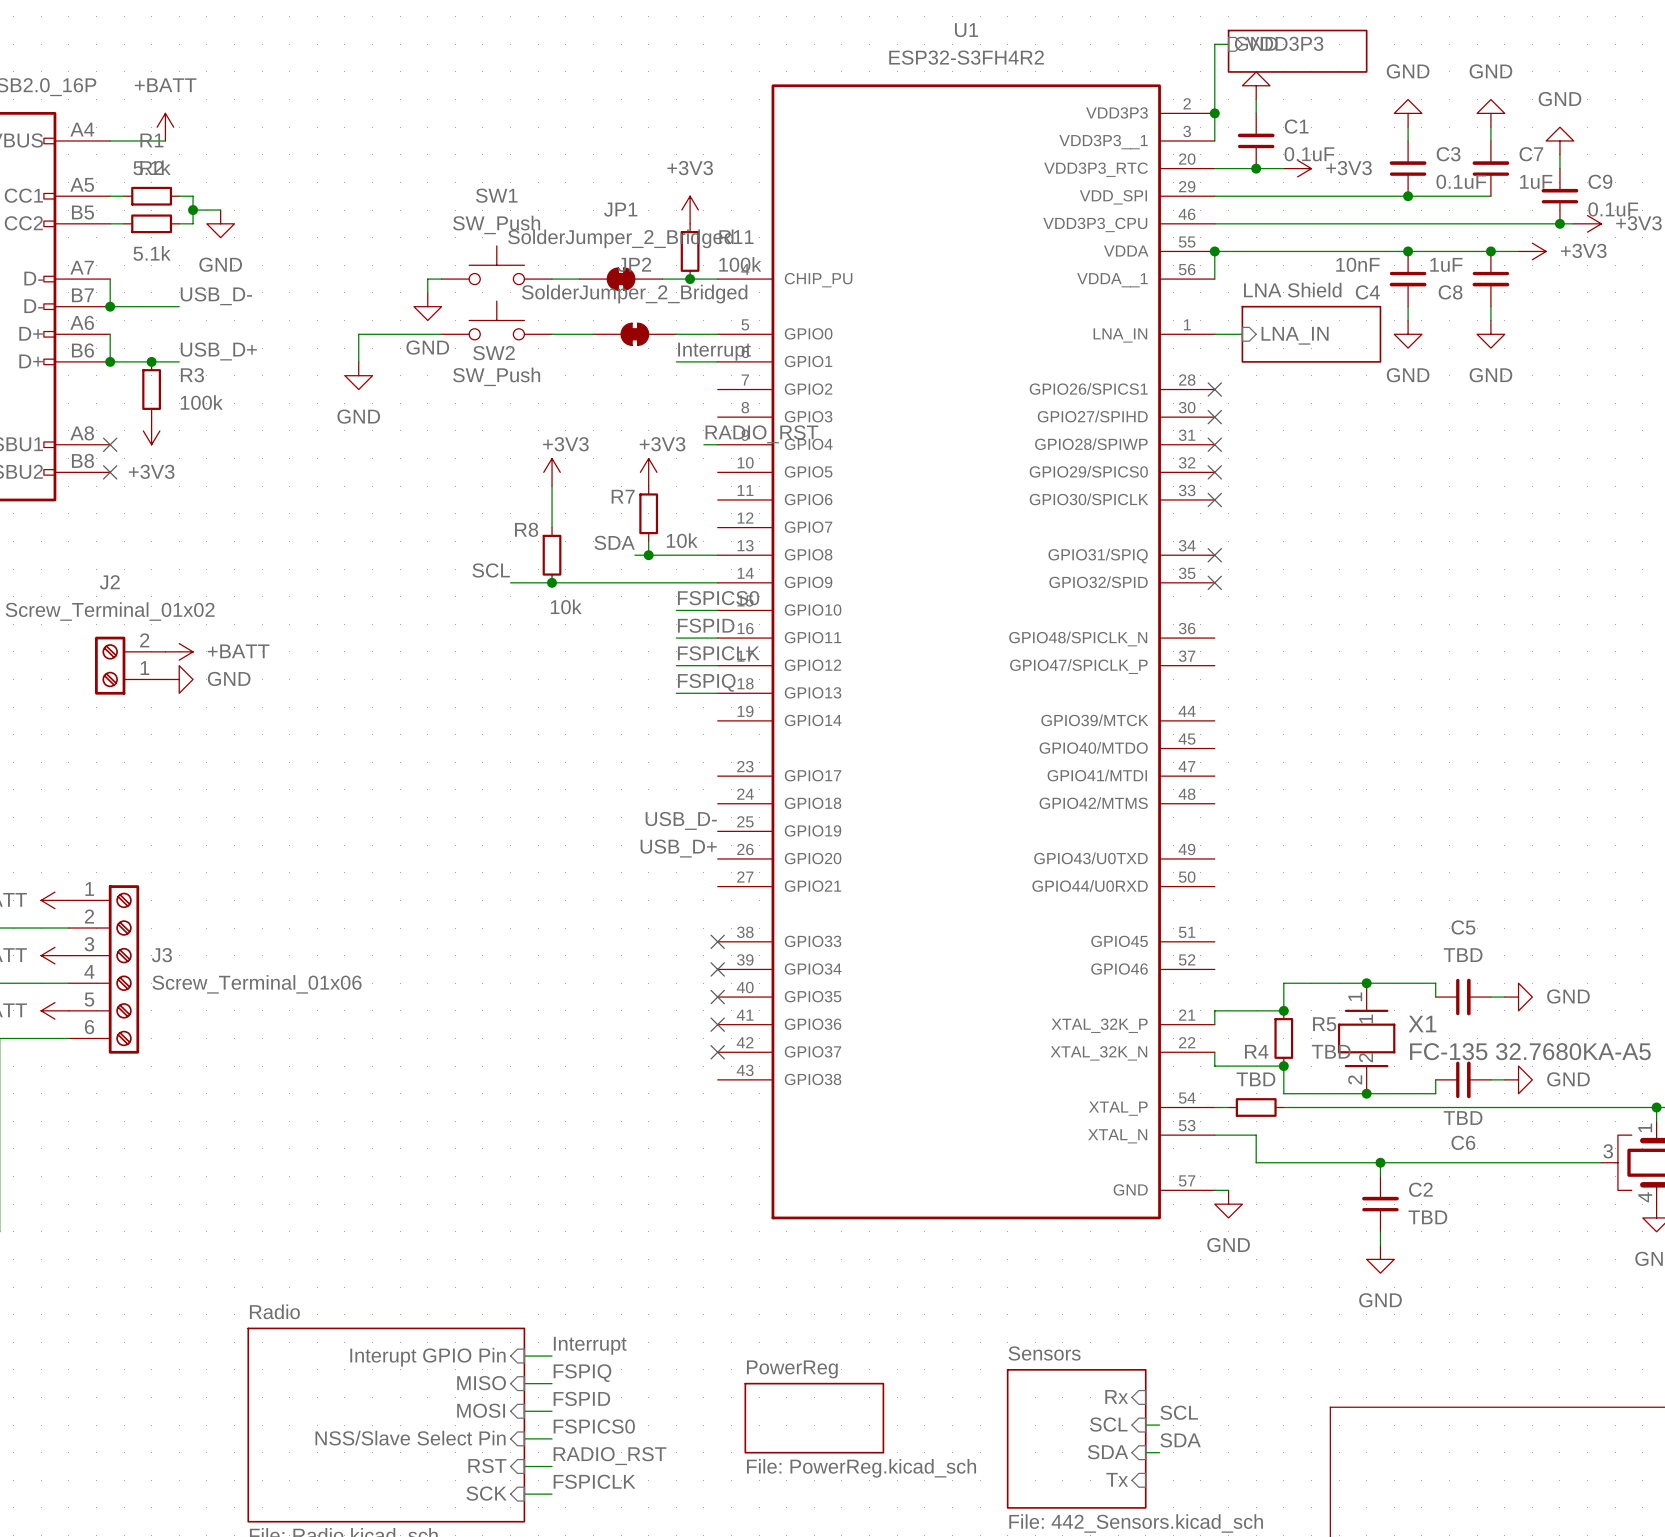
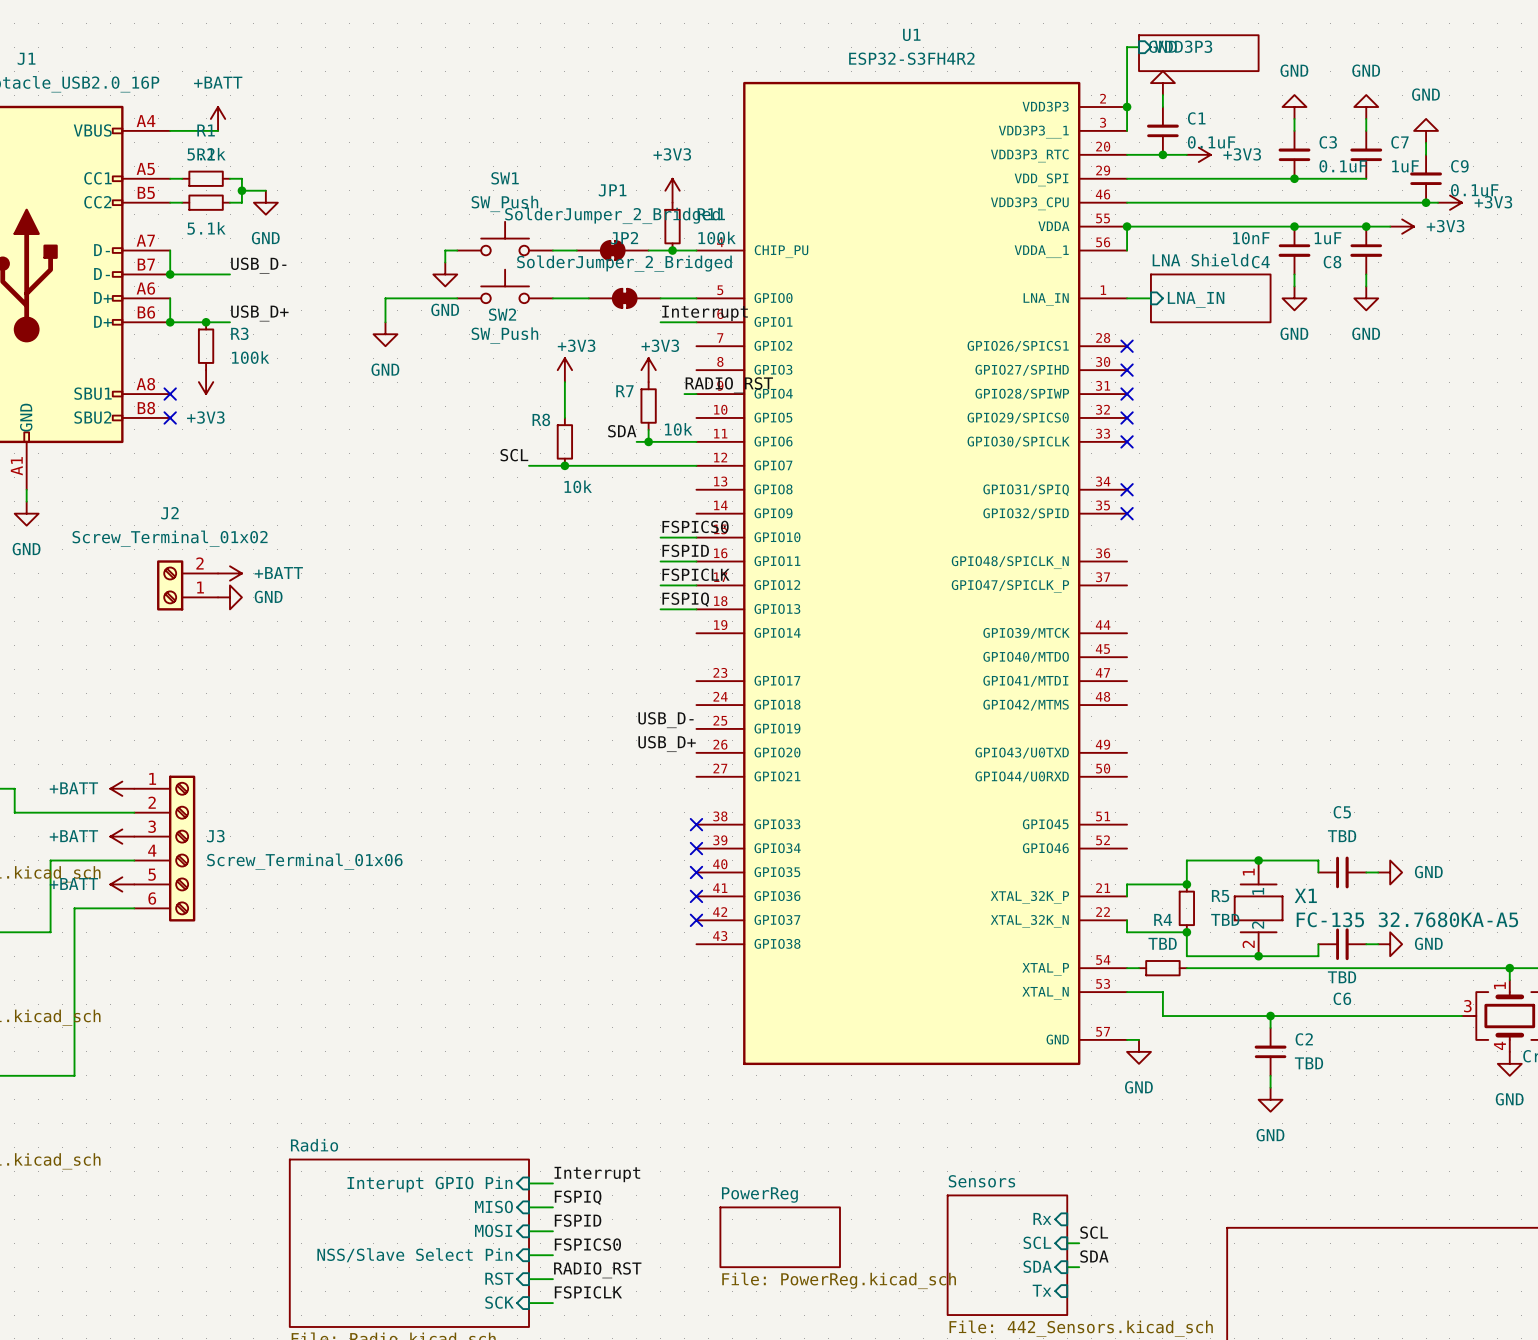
power symbol: none -> +3V3 (564, 370)
power symbol: none -> +3V3 (648, 370)
power symbol: +3V3 (552, 472) -> none
power symbol: +3V3 (648, 472) -> none
wire: (552, 486) (552, 527) -> (564, 382) (564, 417)
wire: none -> (636, 441) (696, 441)
junction: none -> (648, 441)
R7 position: (648, 513) -> (648, 406)
wire: none -> (529, 465) (696, 465)
junction: none -> (564, 465)
wire: (648, 541) (648, 555) -> (648, 429) (648, 441)
label position: SDA (614, 542) -> SDA (622, 431)
R8 position: (552, 555) -> (564, 441)
wire: (634, 555) (717, 555) -> none
junction: (648, 555) -> none
label position: SCL (491, 570) -> SCL (514, 455)
wire: (510, 582) (717, 582) -> none
junction: (552, 582) -> none

